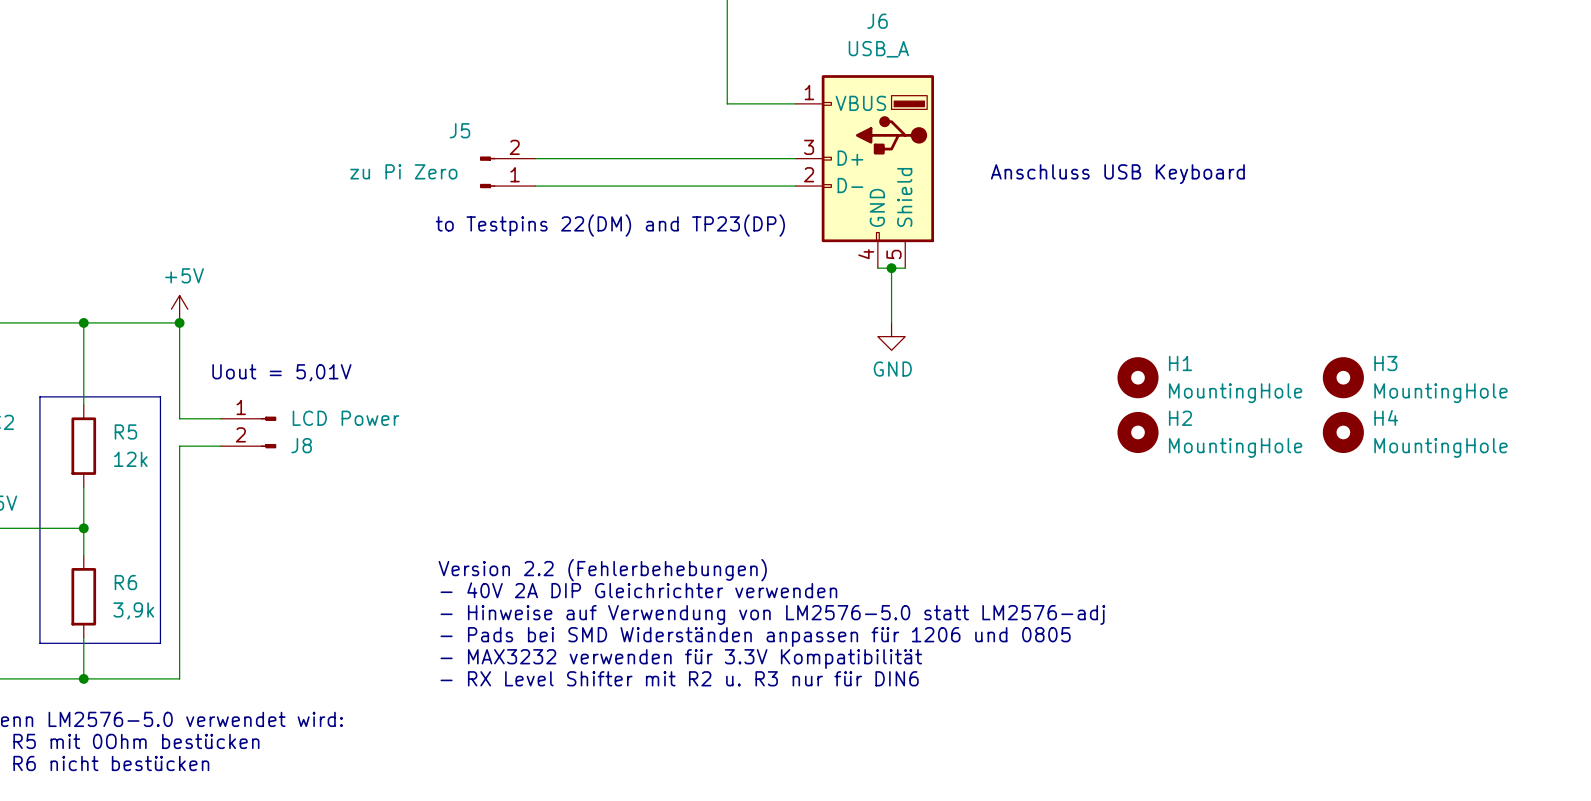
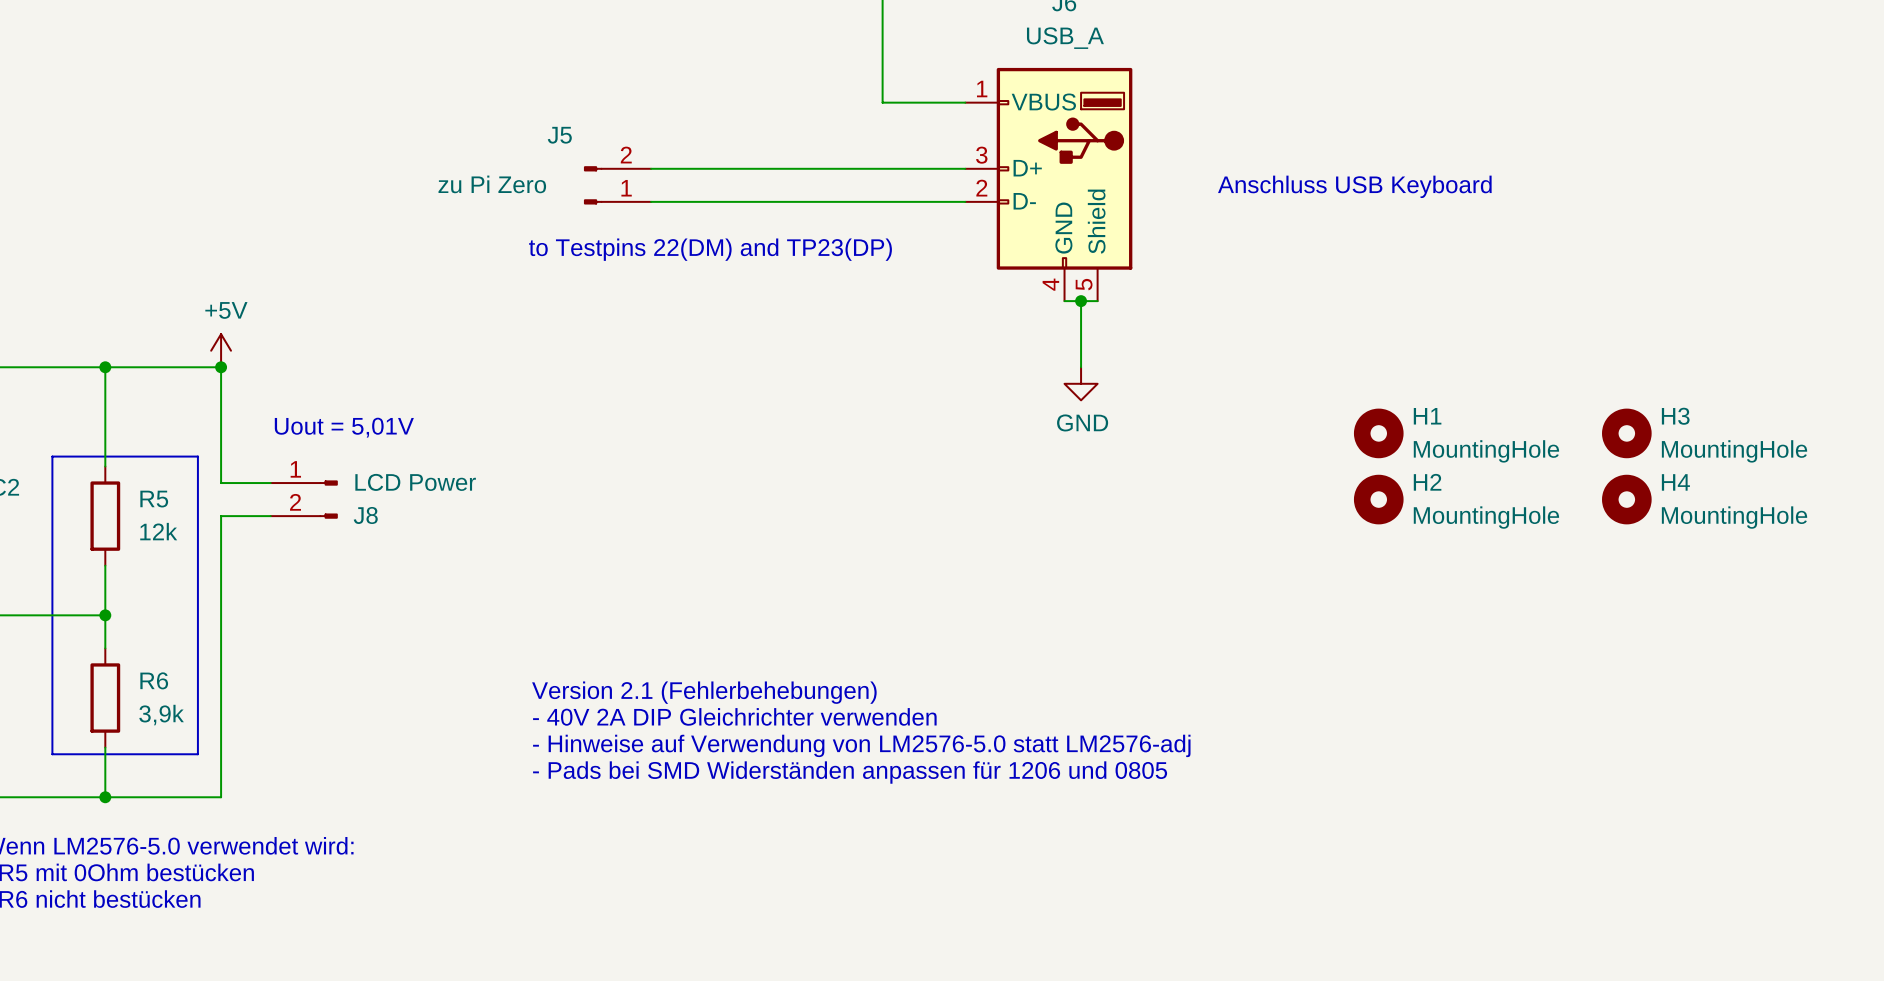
text: Version 2.2 (Fehlerbehebungen) (602, 570) -> none
text: - 40V 2A DIP Gleichrichter verwenden (638, 590) -> Version 2.1 (Fehlerbehebungen) (704, 692)
text: - Hinweise auf Verwendung von LM2576-5.0 statt LM2576-adj (772, 614) -> - 40V 2A DIP Gleichrichter verwenden (734, 716)
text: - Pads bei SMD Widerständen anpassen für 1206 und 0805 (755, 636) -> - Hinweise auf Verwendung von LM2576-5.0 statt LM2576-adj (861, 745)
text: - MAX3232 verwenden für 3.3V Kompatibilität (681, 659) -> - Pads bei SMD Widerständen anpassen für 1206 und 0805 (850, 772)
text: - RX Level Shifter mit R2 u. R3 nur für DIN6 (679, 678) -> none

